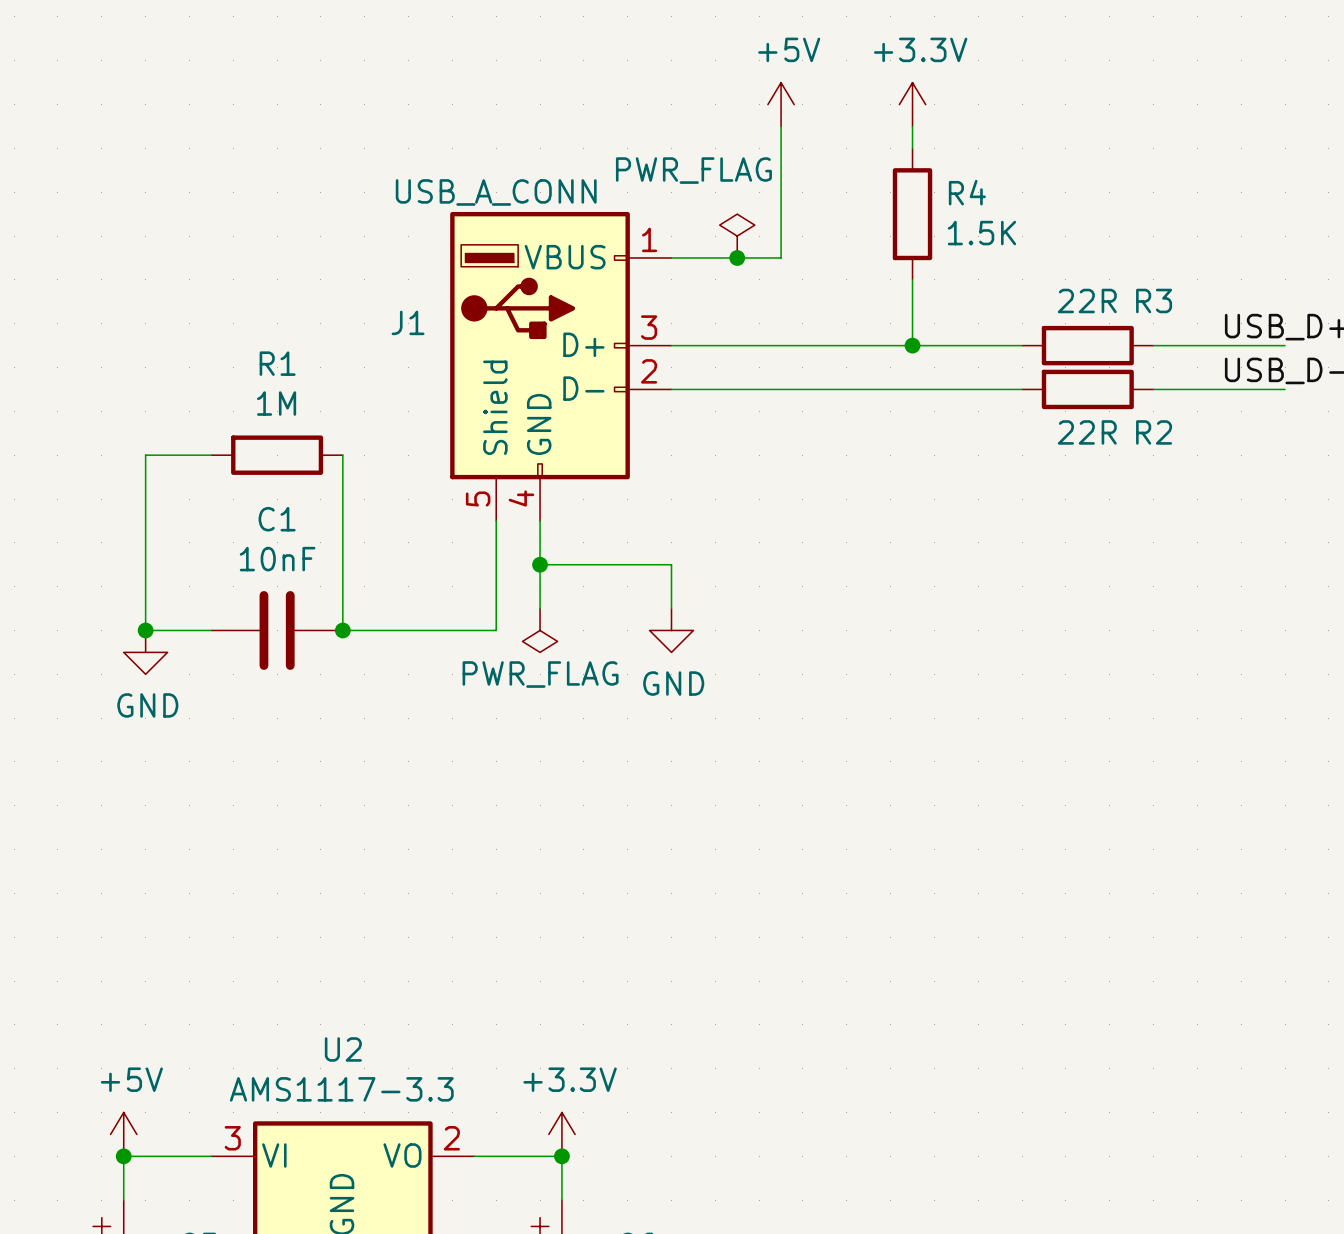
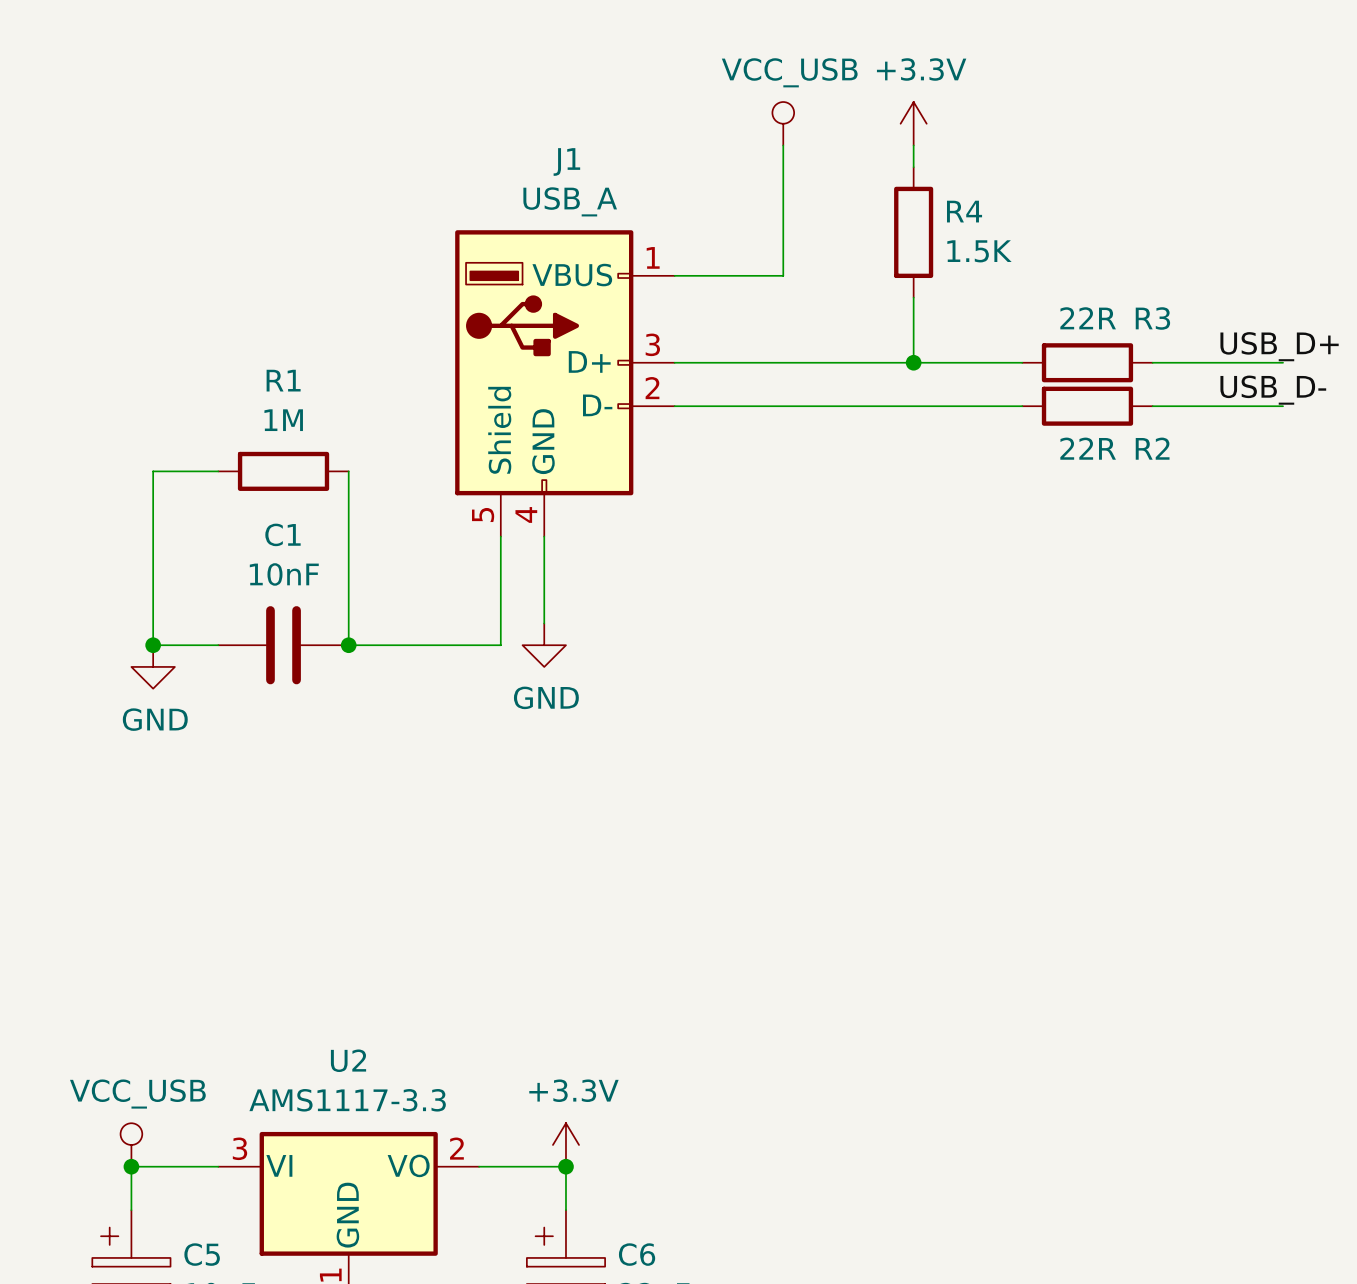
power symbol: +5V (781, 104) -> VCC_USB (783, 123)
J1 value: USB_A_CONN (496, 192) -> USB_A (570, 201)
power symbol: PWR_FLAG (737, 236) -> none
junction: (737, 257) -> none
J1 name position: J1 (408, 322) -> J1 (566, 161)
wire: (540, 564) (671, 564) (671, 608) -> none
junction: (540, 564) -> none
power symbol: PWR_FLAG (540, 630) -> GND (544, 645)
power symbol: GND (671, 630) -> none
power symbol: +5V (123, 1134) -> VCC_USB (131, 1144)

